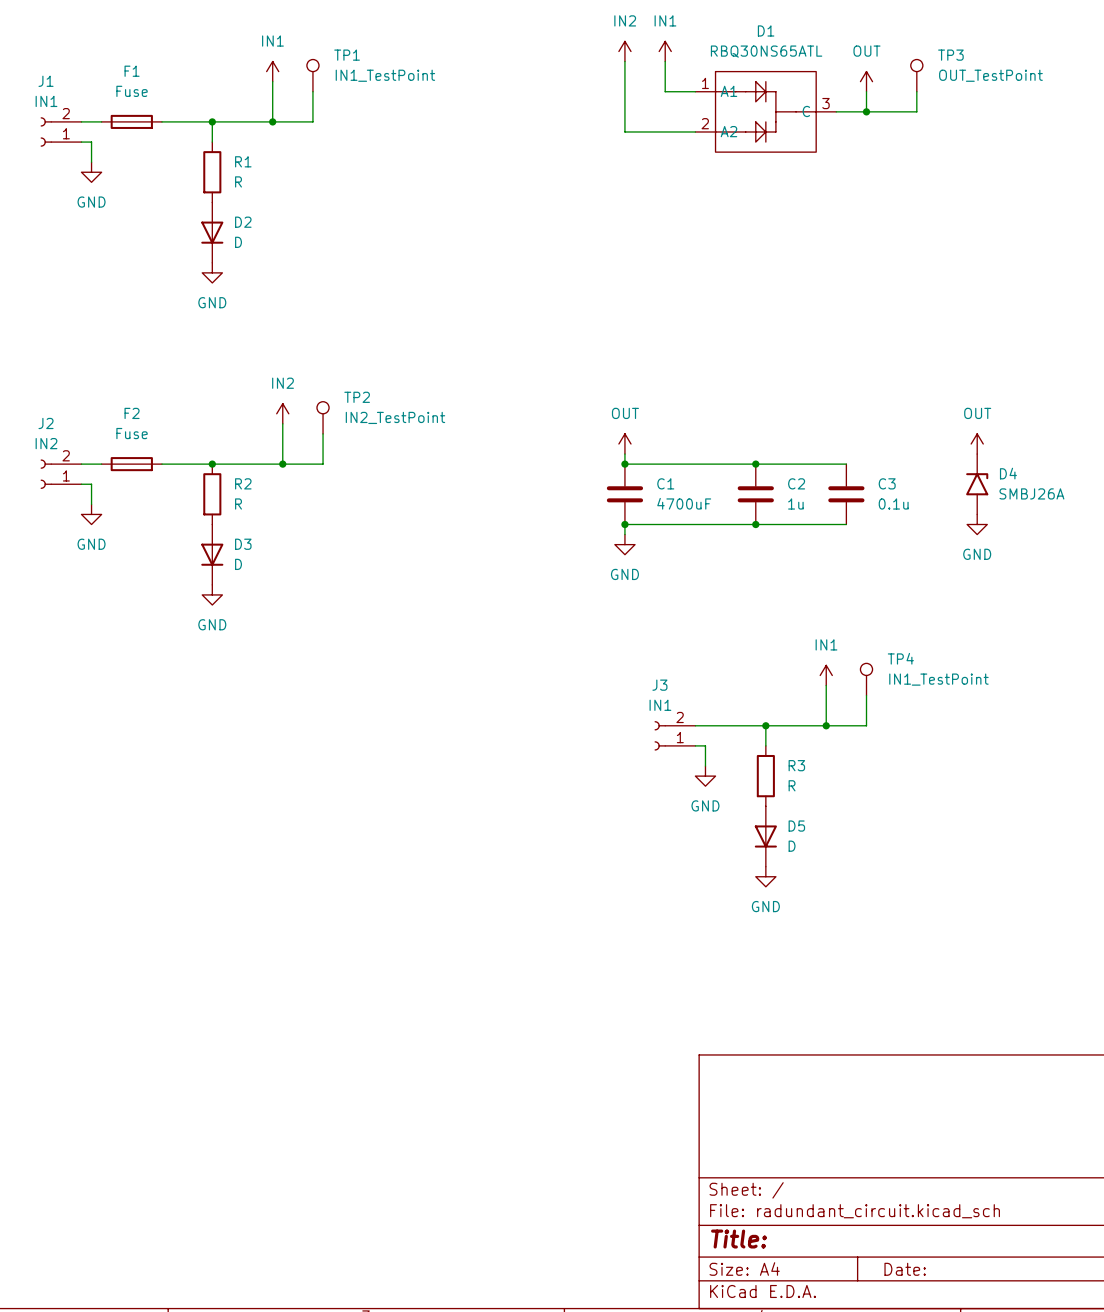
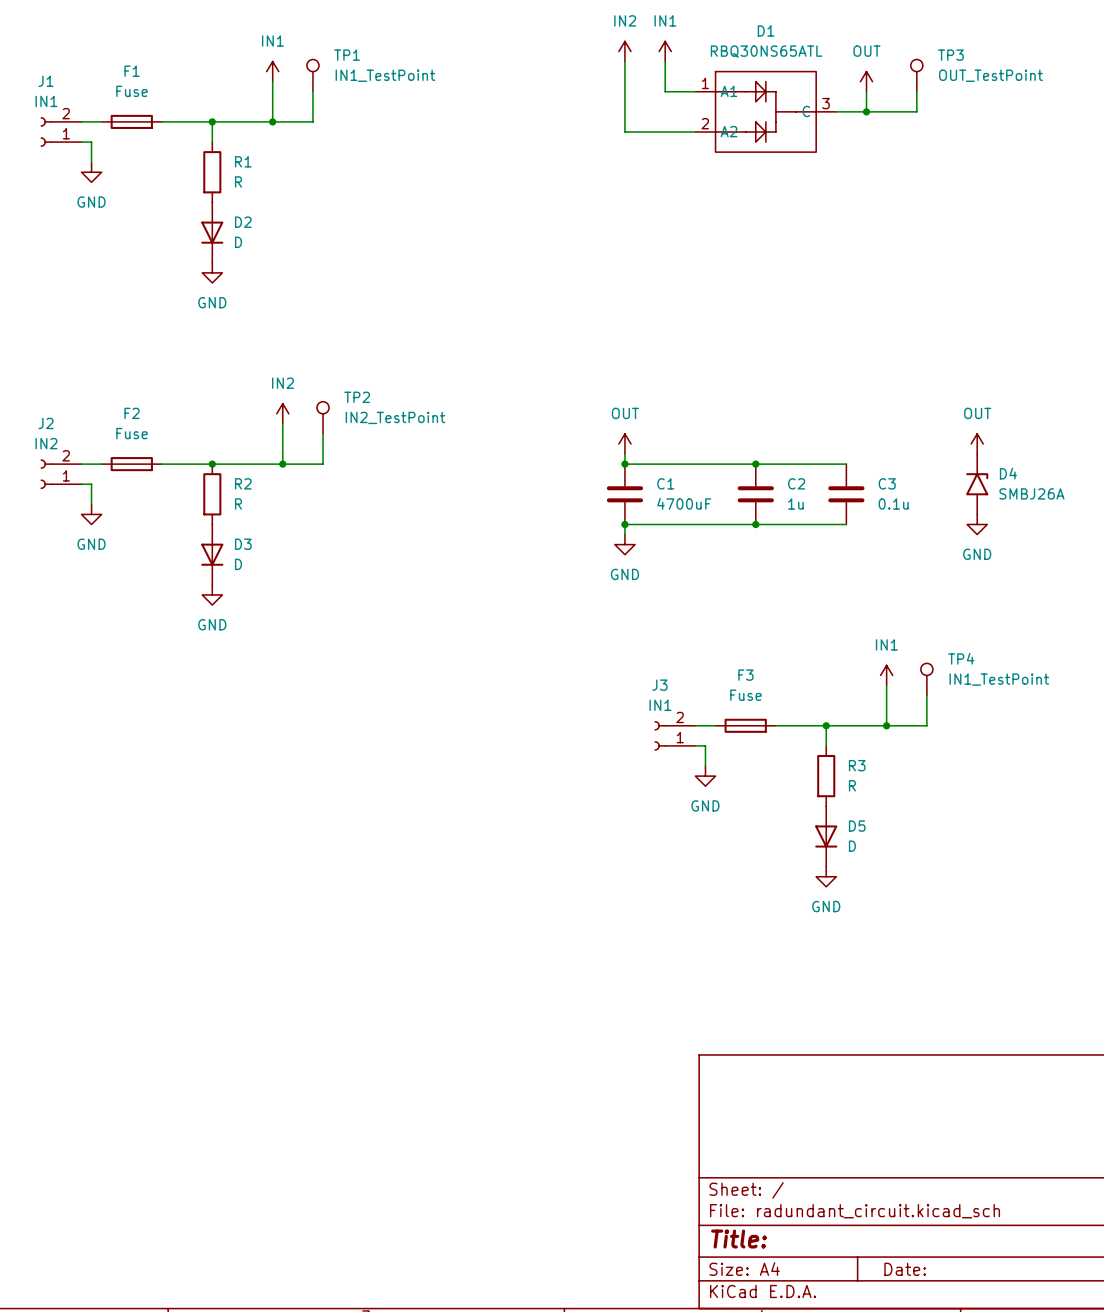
power symbol position: IN1 (826, 675) -> IN1 (886, 675)
TP4 position: (866, 679) -> (926, 679)
wire: (826, 685) (826, 725) -> (826, 745) (826, 725)
wire: none -> (886, 685) (886, 725)
wire: (866, 695) (866, 725) -> (926, 695) (926, 725) (866, 725)
F3: none -> Fuse (745, 725)
wire: (765, 725) (765, 745) -> none
junction: (765, 725) -> none
junction: none -> (886, 725)
R3 position: (765, 776) -> (826, 776)
D5 position: (765, 836) -> (826, 836)
power symbol position: GND (765, 876) -> GND (826, 876)

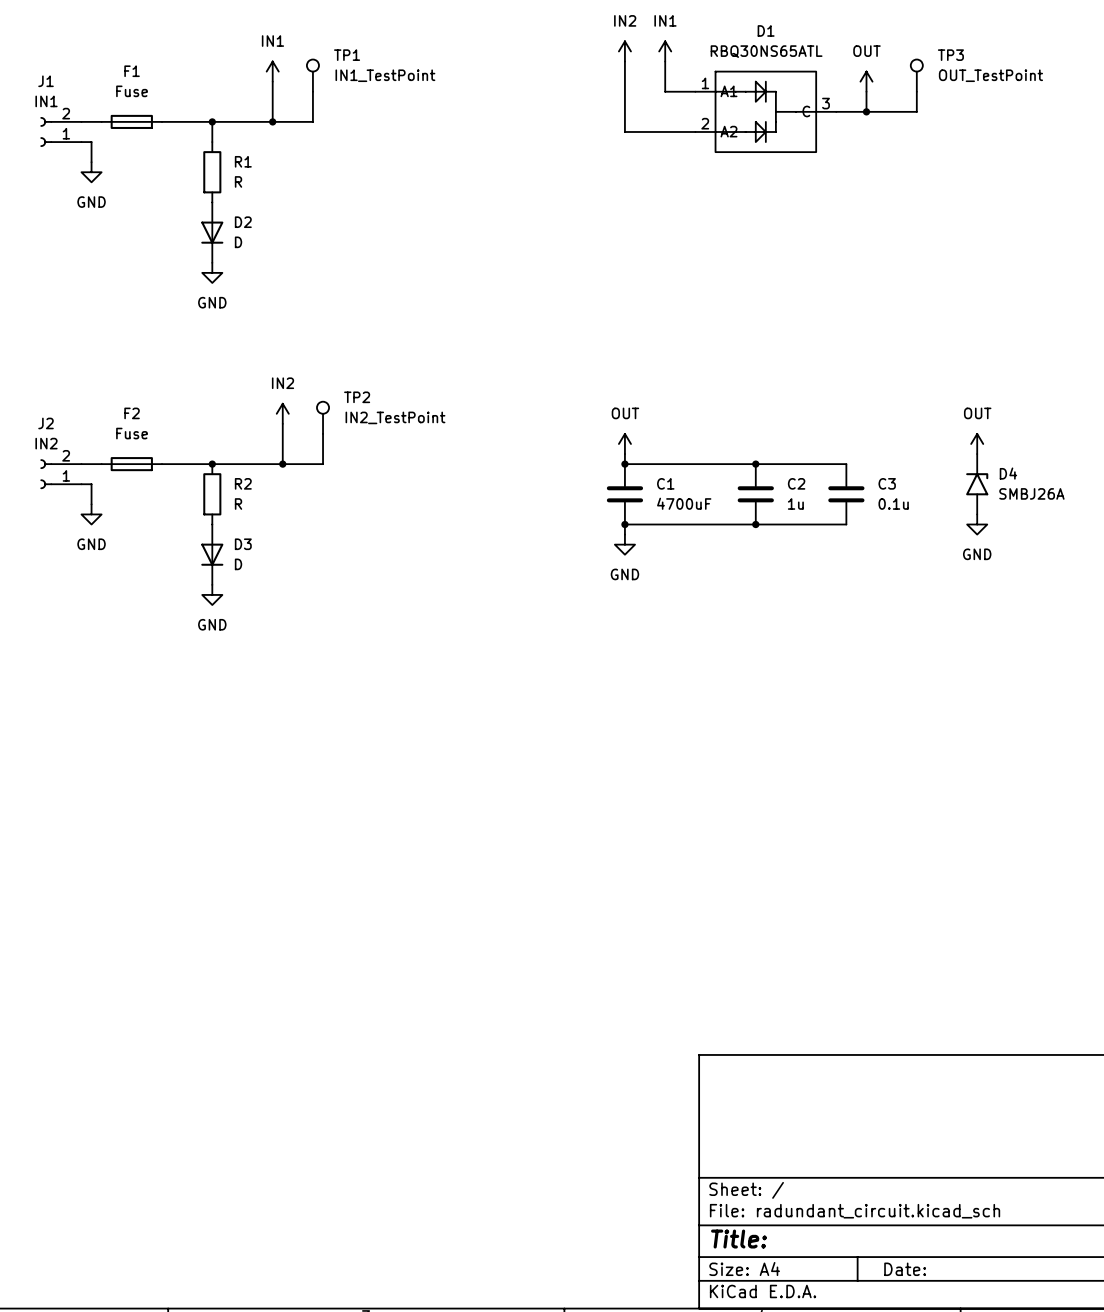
power symbol: IN1 (886, 675) -> none
TP4: IN1_TestPoint (926, 679) -> none
wire: (886, 685) (886, 725) -> none
wire: (926, 695) (926, 725) (775, 725) -> none
wire: (695, 725) (715, 725) -> none
F3: Fuse (745, 725) -> none
wire: (826, 725) (826, 745) -> none
junction: (826, 725) -> none
junction: (886, 725) -> none
J3: IN1 (674, 735) -> none
wire: (695, 745) (705, 745) (705, 766) -> none
power symbol: GND (705, 776) -> none
R3: R (826, 776) -> none
D5: D (826, 836) -> none
power symbol: GND (826, 876) -> none

